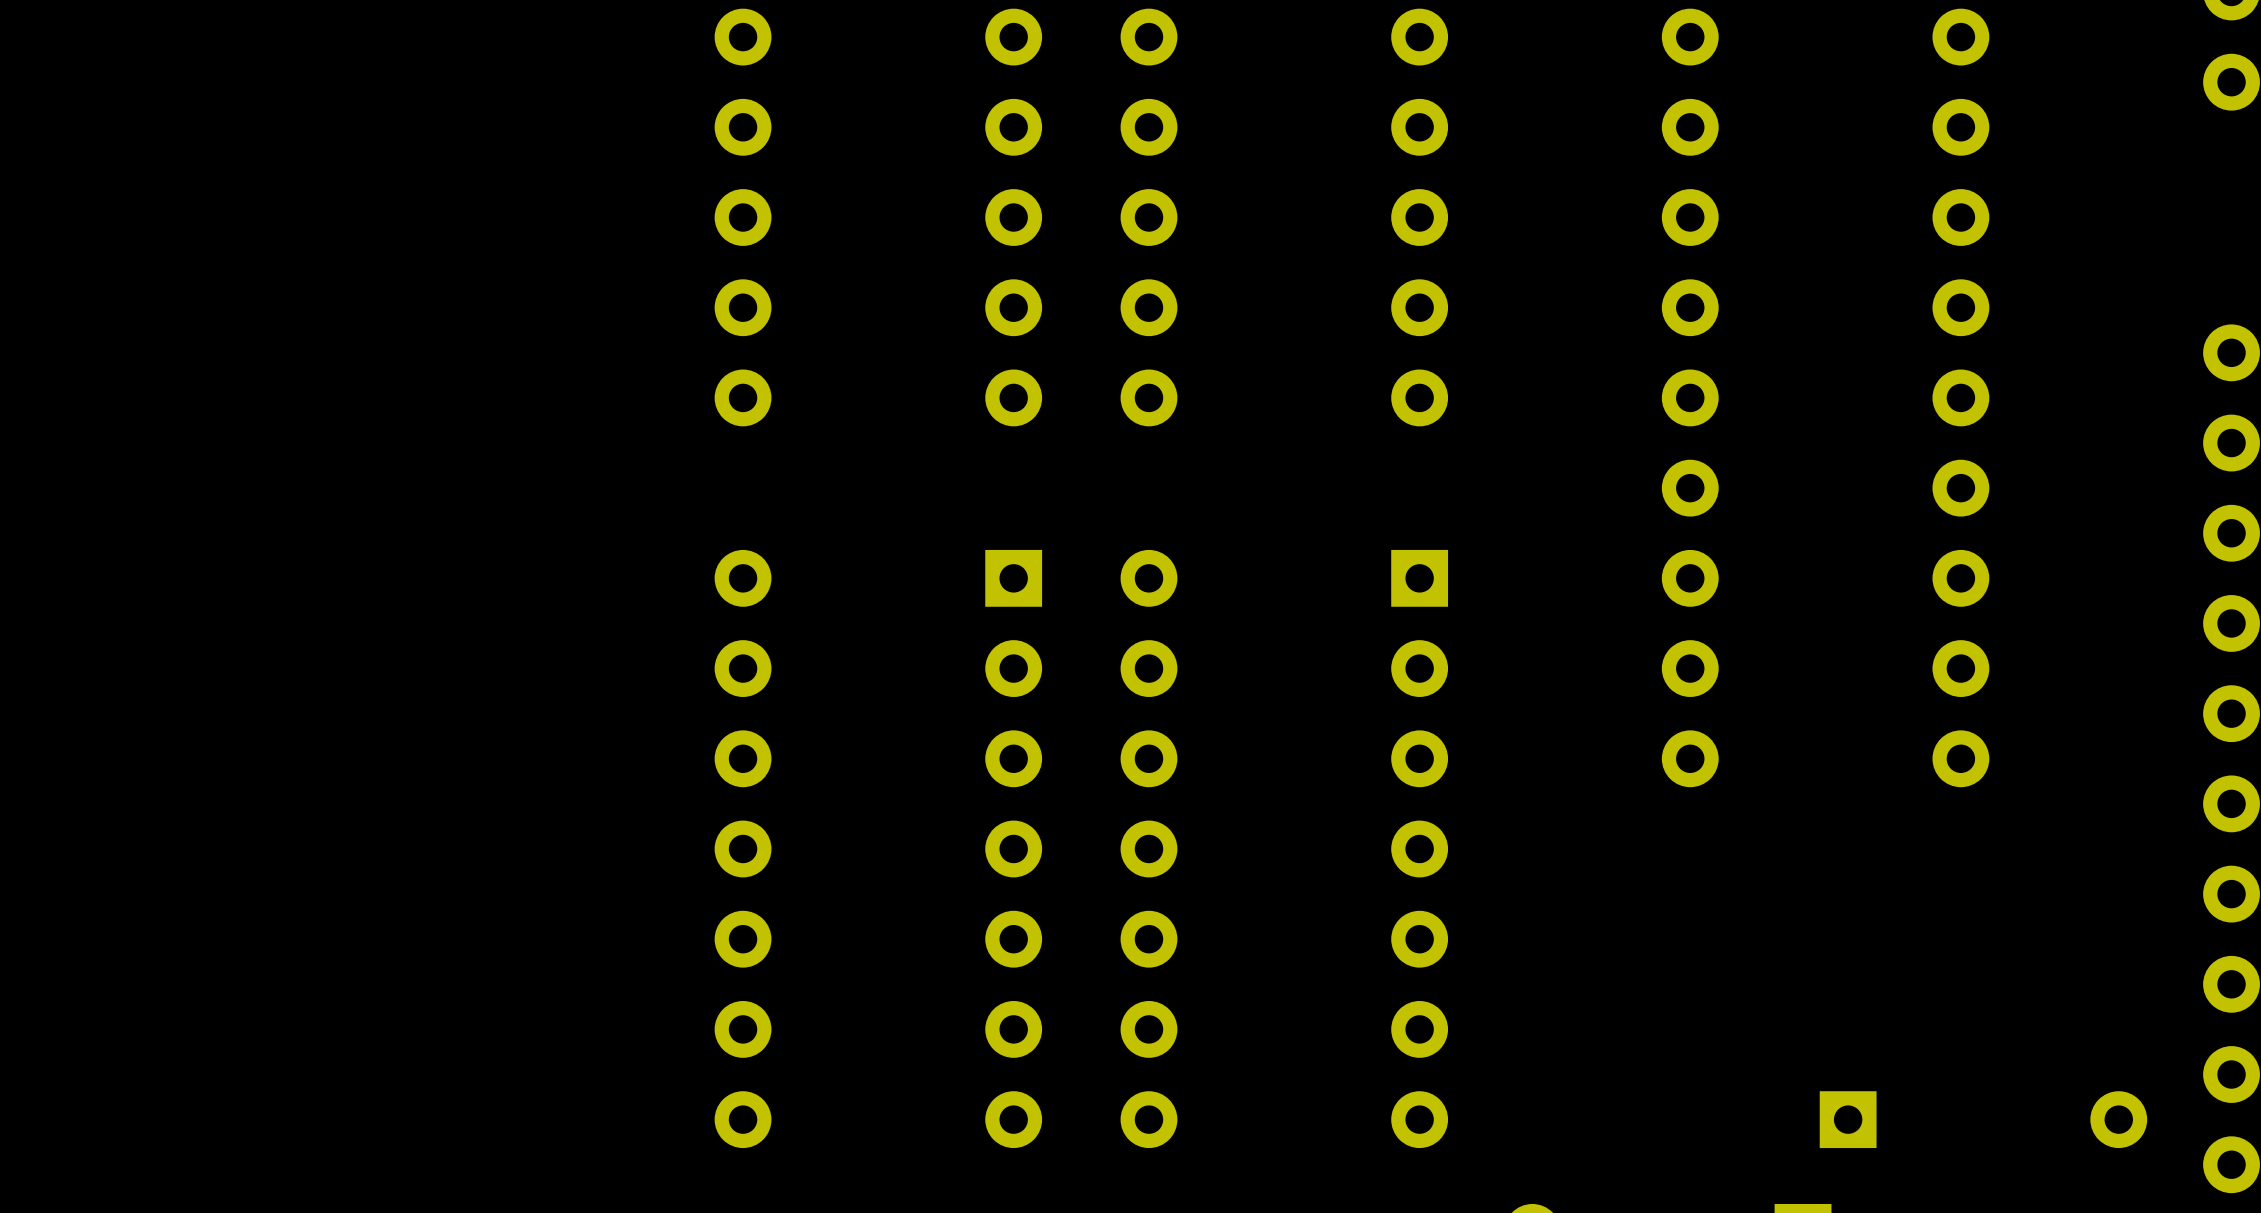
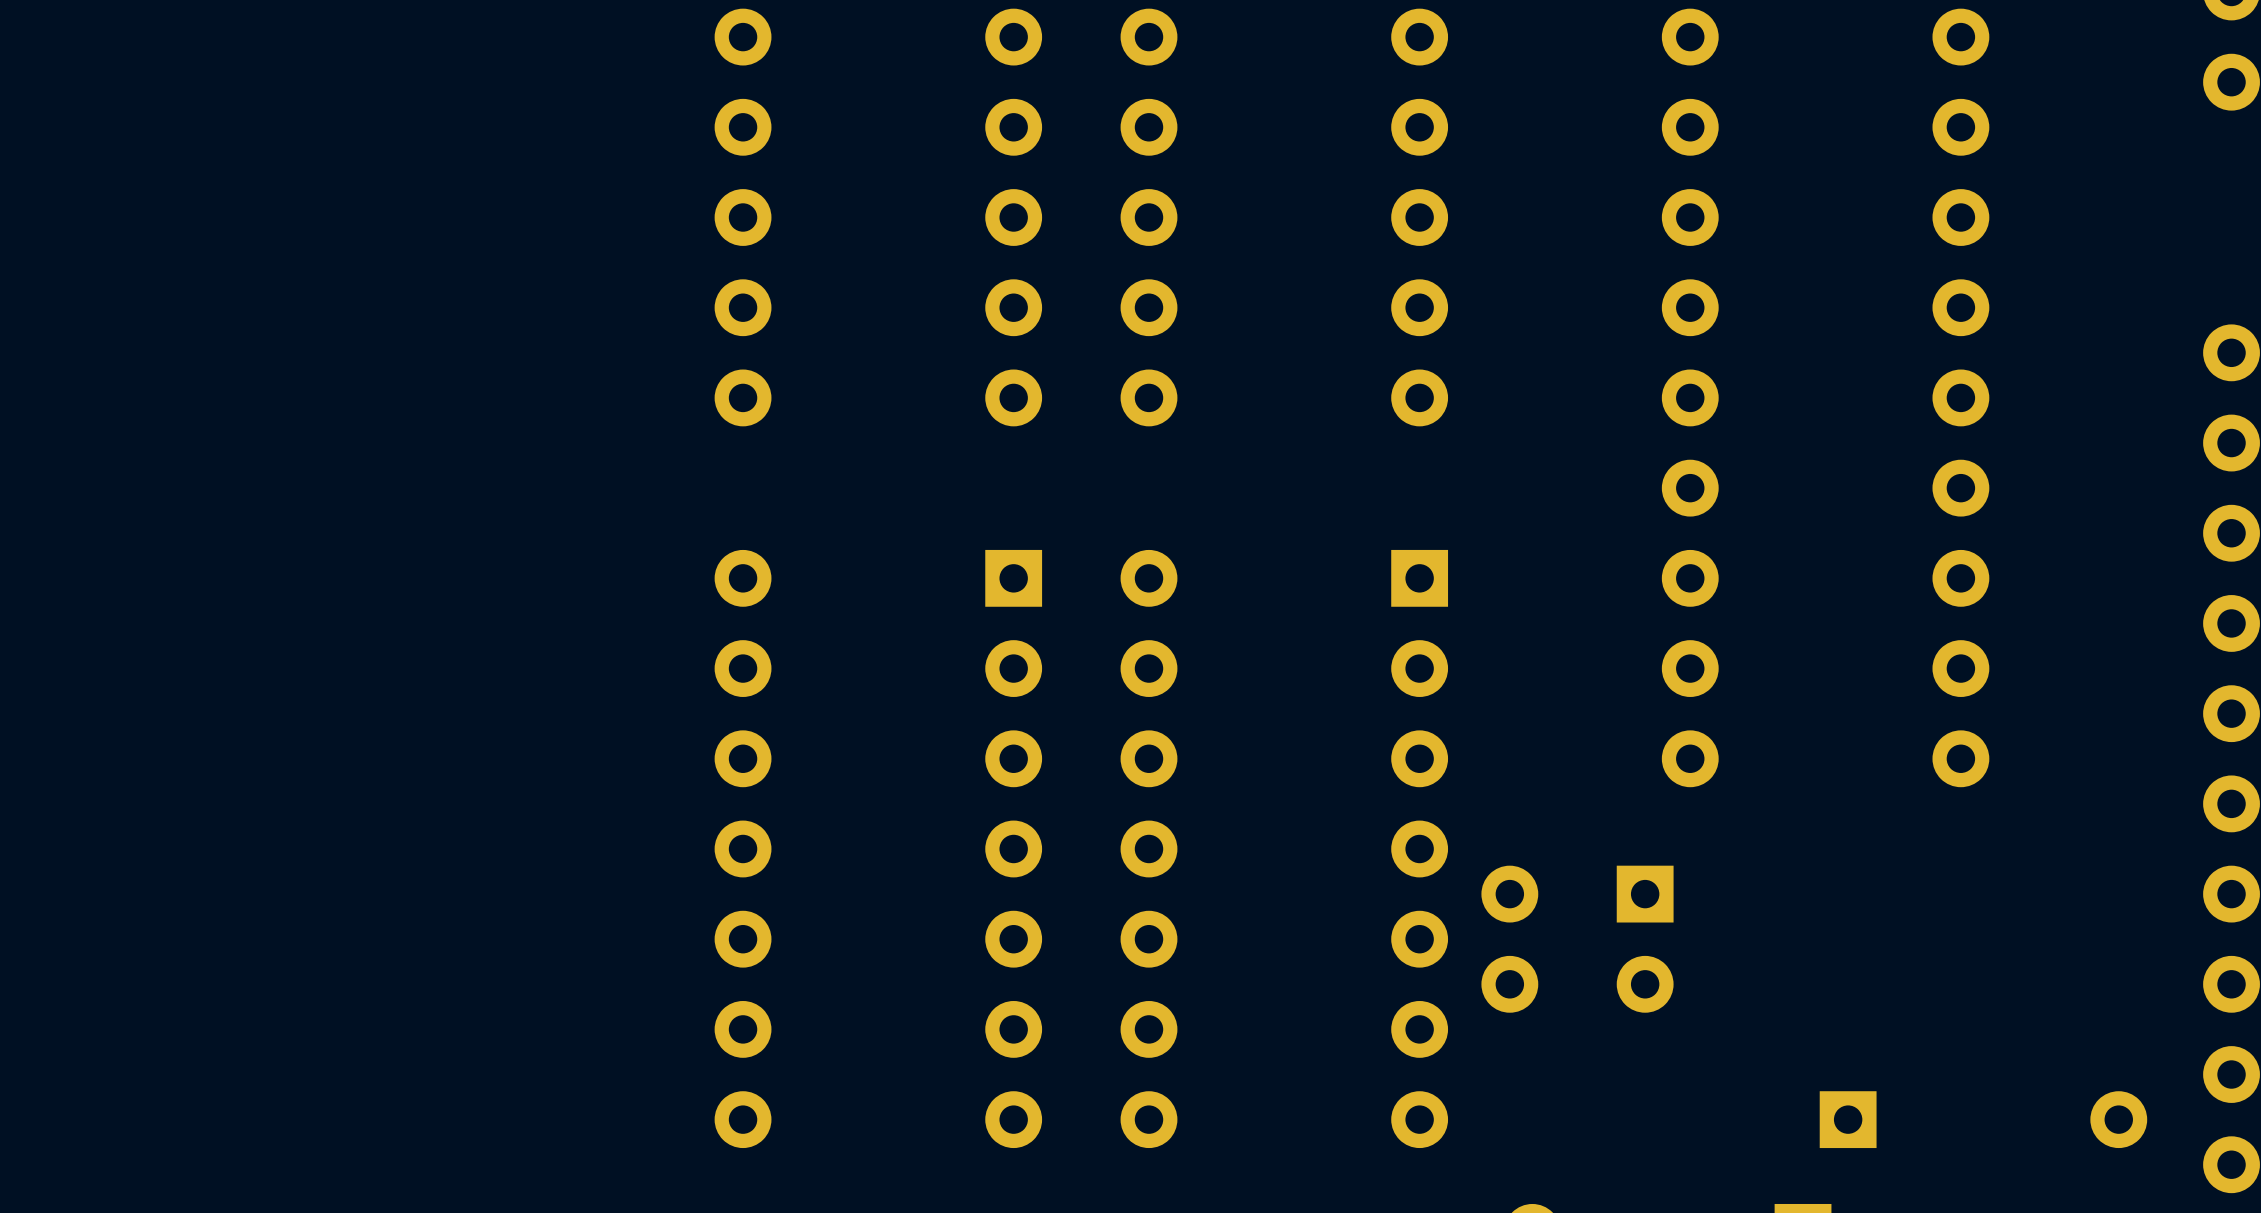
part: none -> (1509, 939)
part: none -> (1645, 939)

